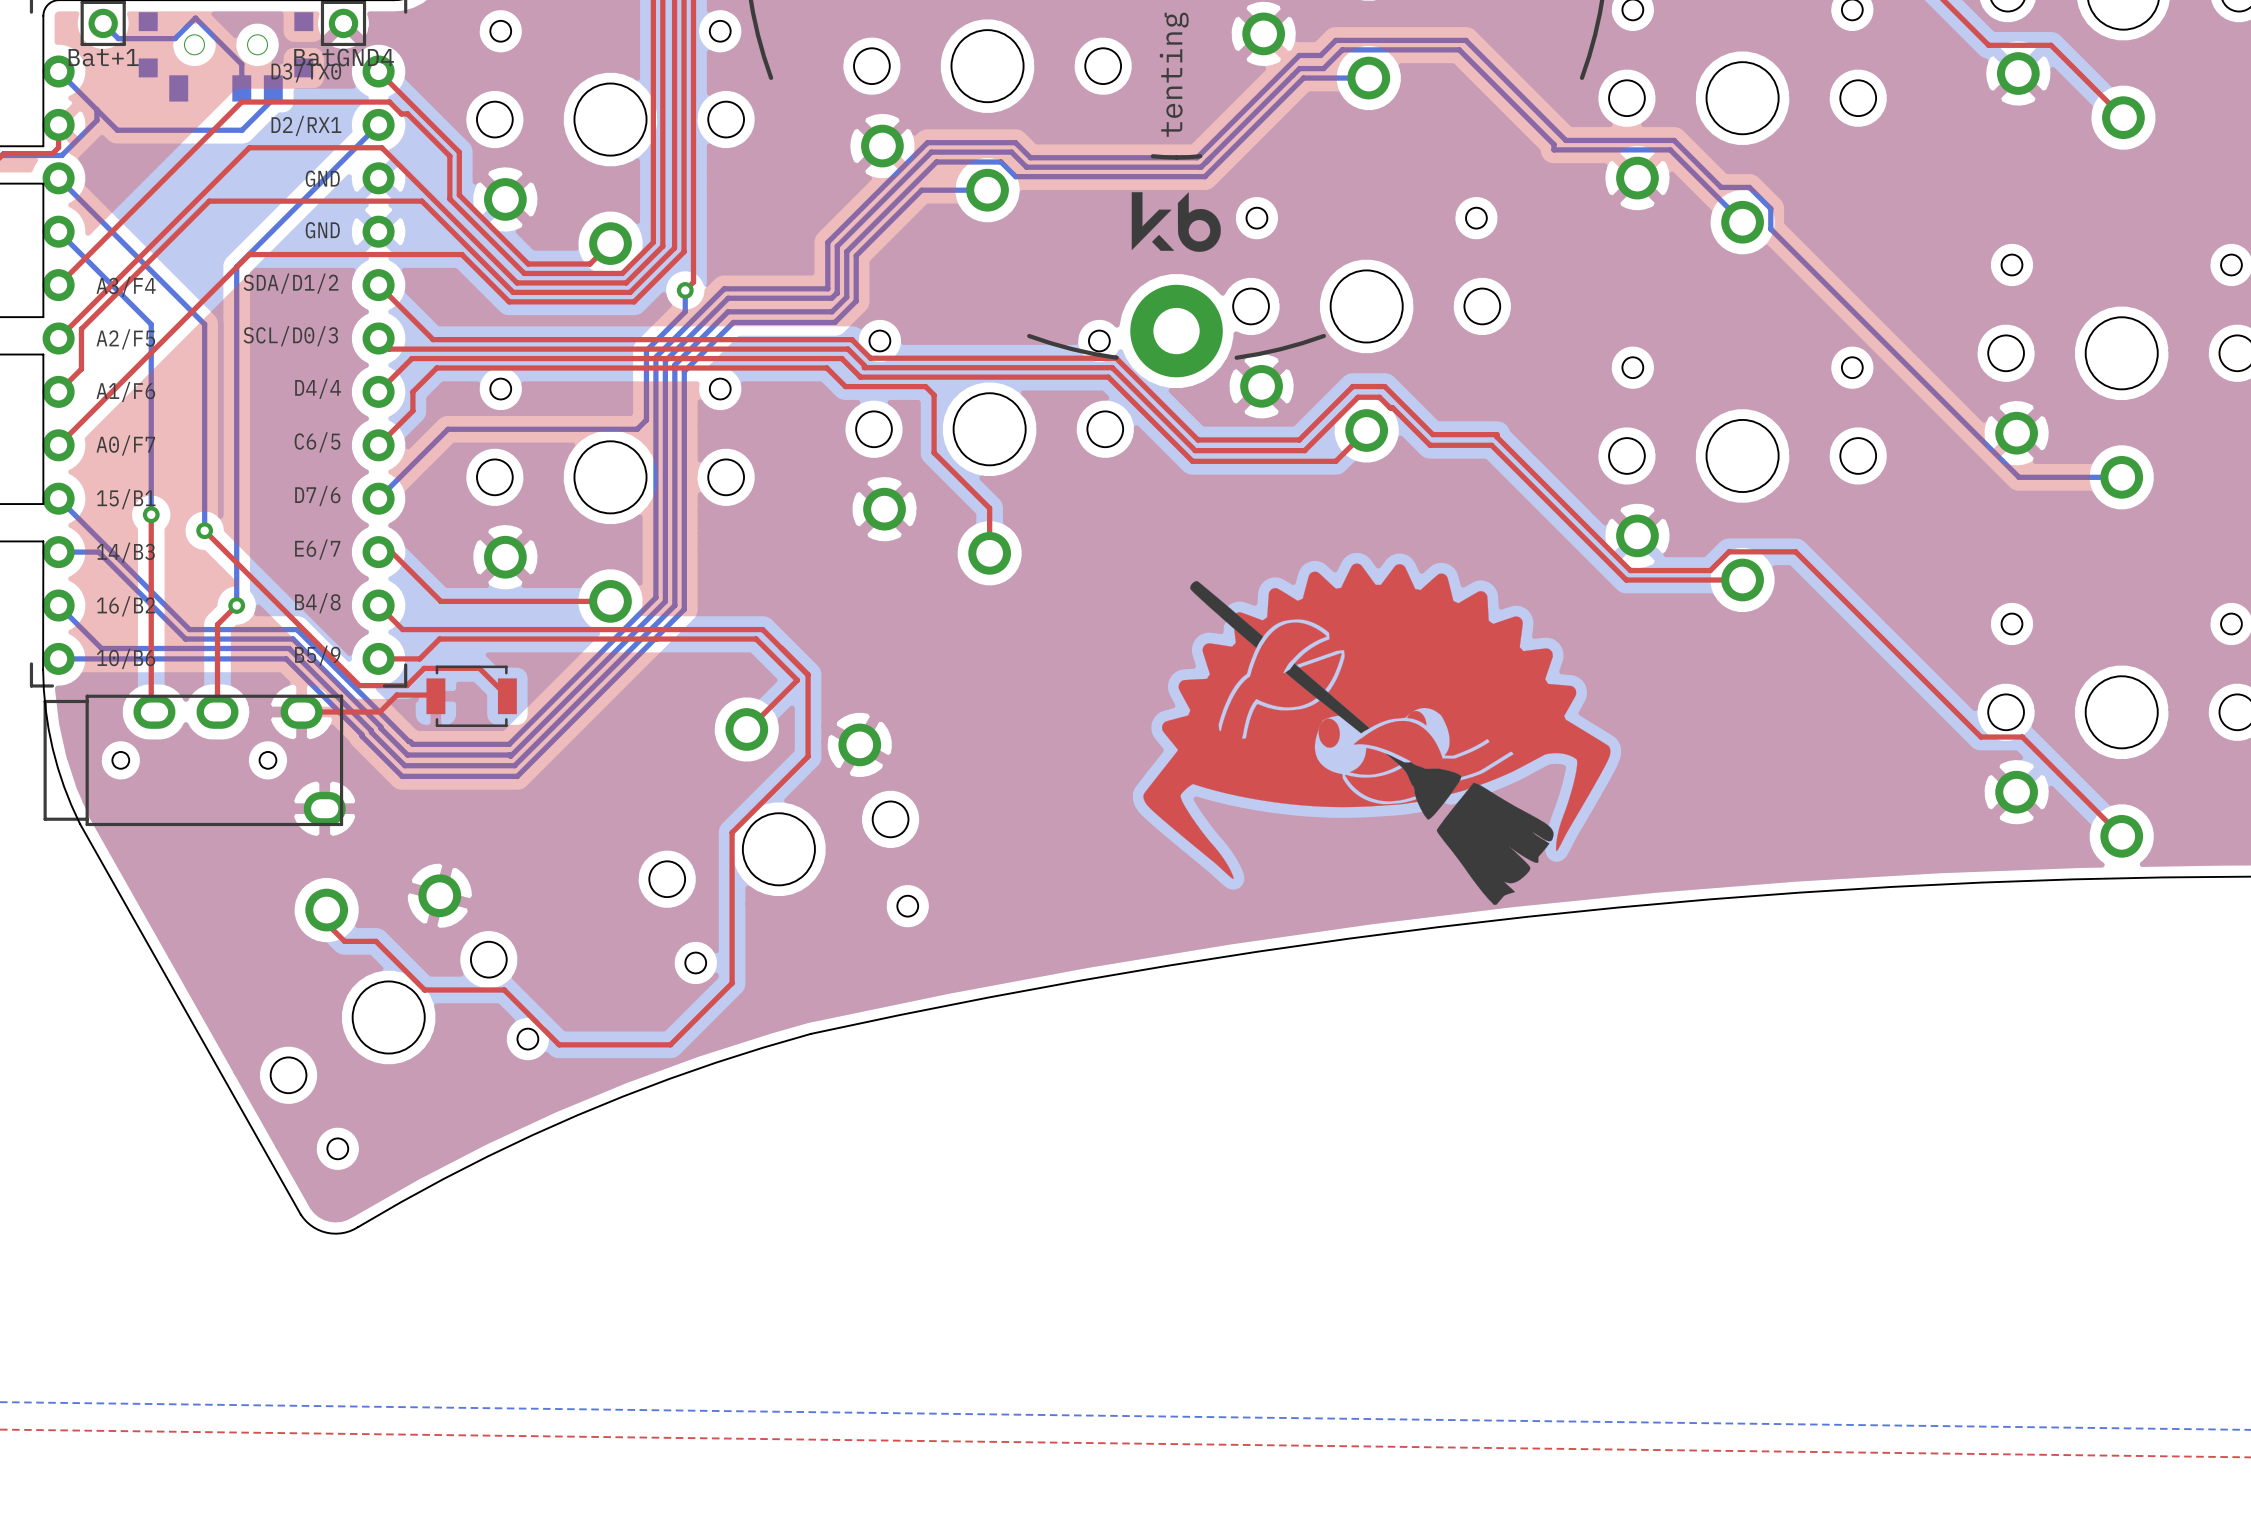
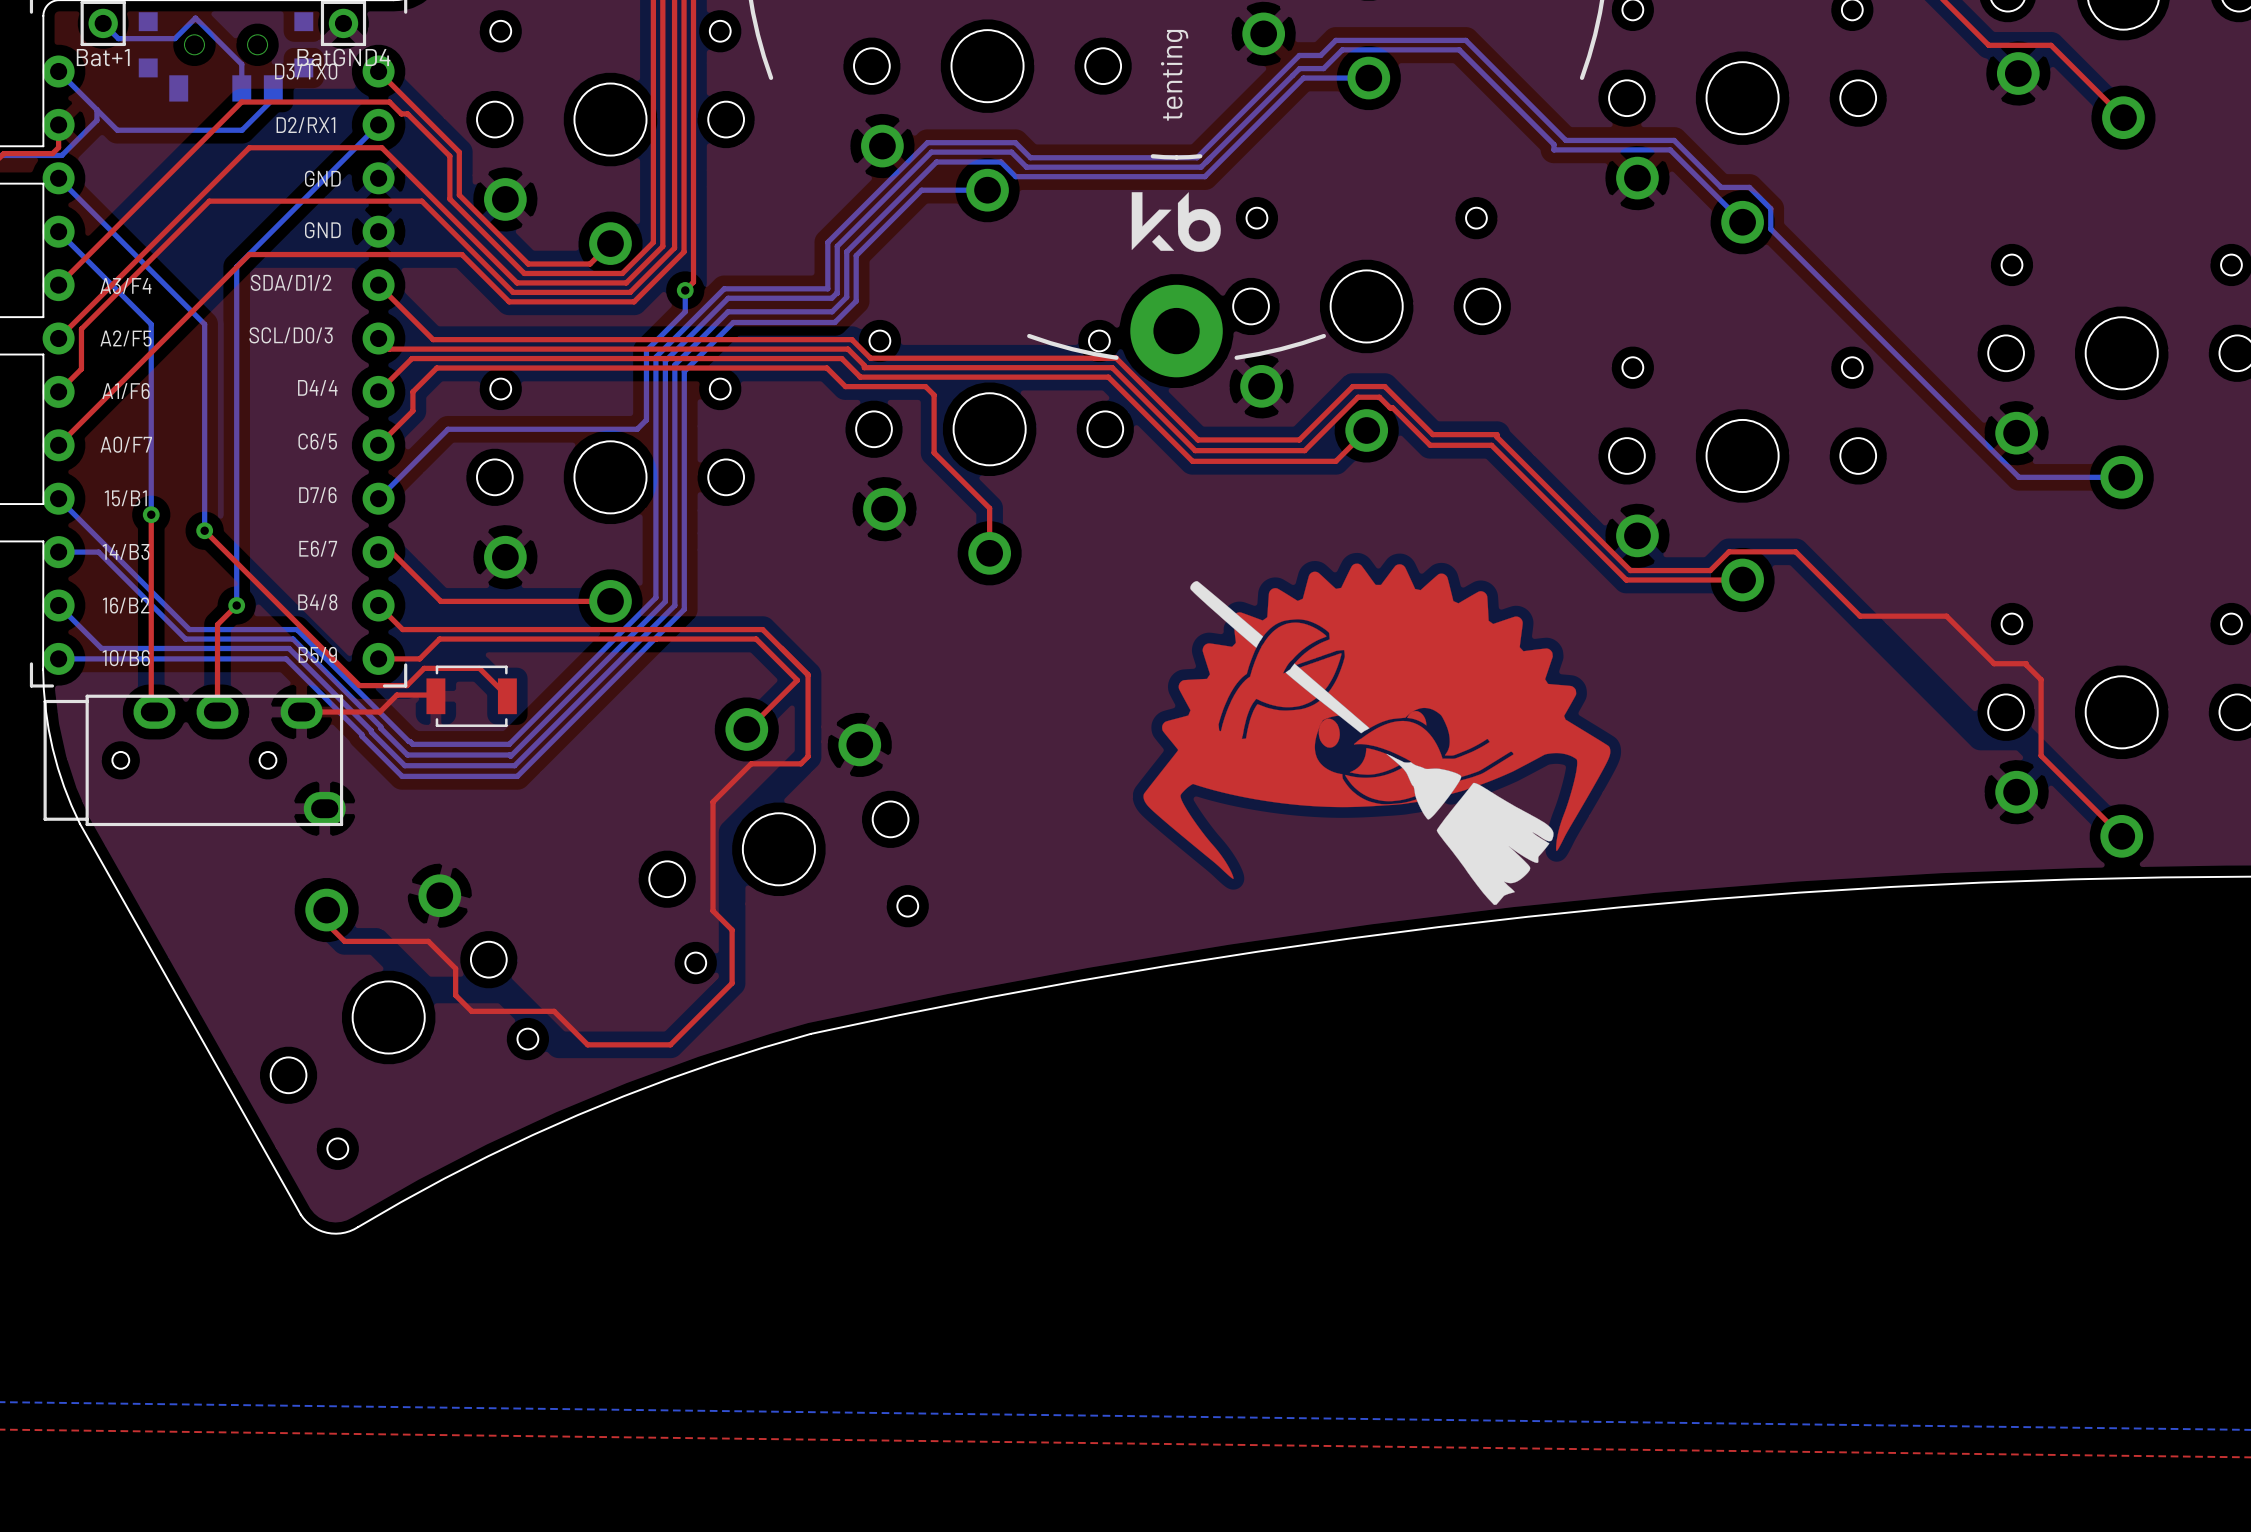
top track: (1860, 616) (1980, 737) (2022, 737) (2041, 755) -> (1860, 616) (1946, 616) (1994, 663) (2026, 663) (2041, 679) (2041, 755)
top track: (800, 763) (732, 832) (732, 930) -> (800, 763) (751, 763) (712, 802) (712, 910) (732, 930)
top track: (376, 941) (424, 989) (504, 989) (559, 1044) (587, 1044) -> (376, 941) (428, 941) (455, 968) (455, 995) (471, 1011) (554, 1011) (587, 1044)

